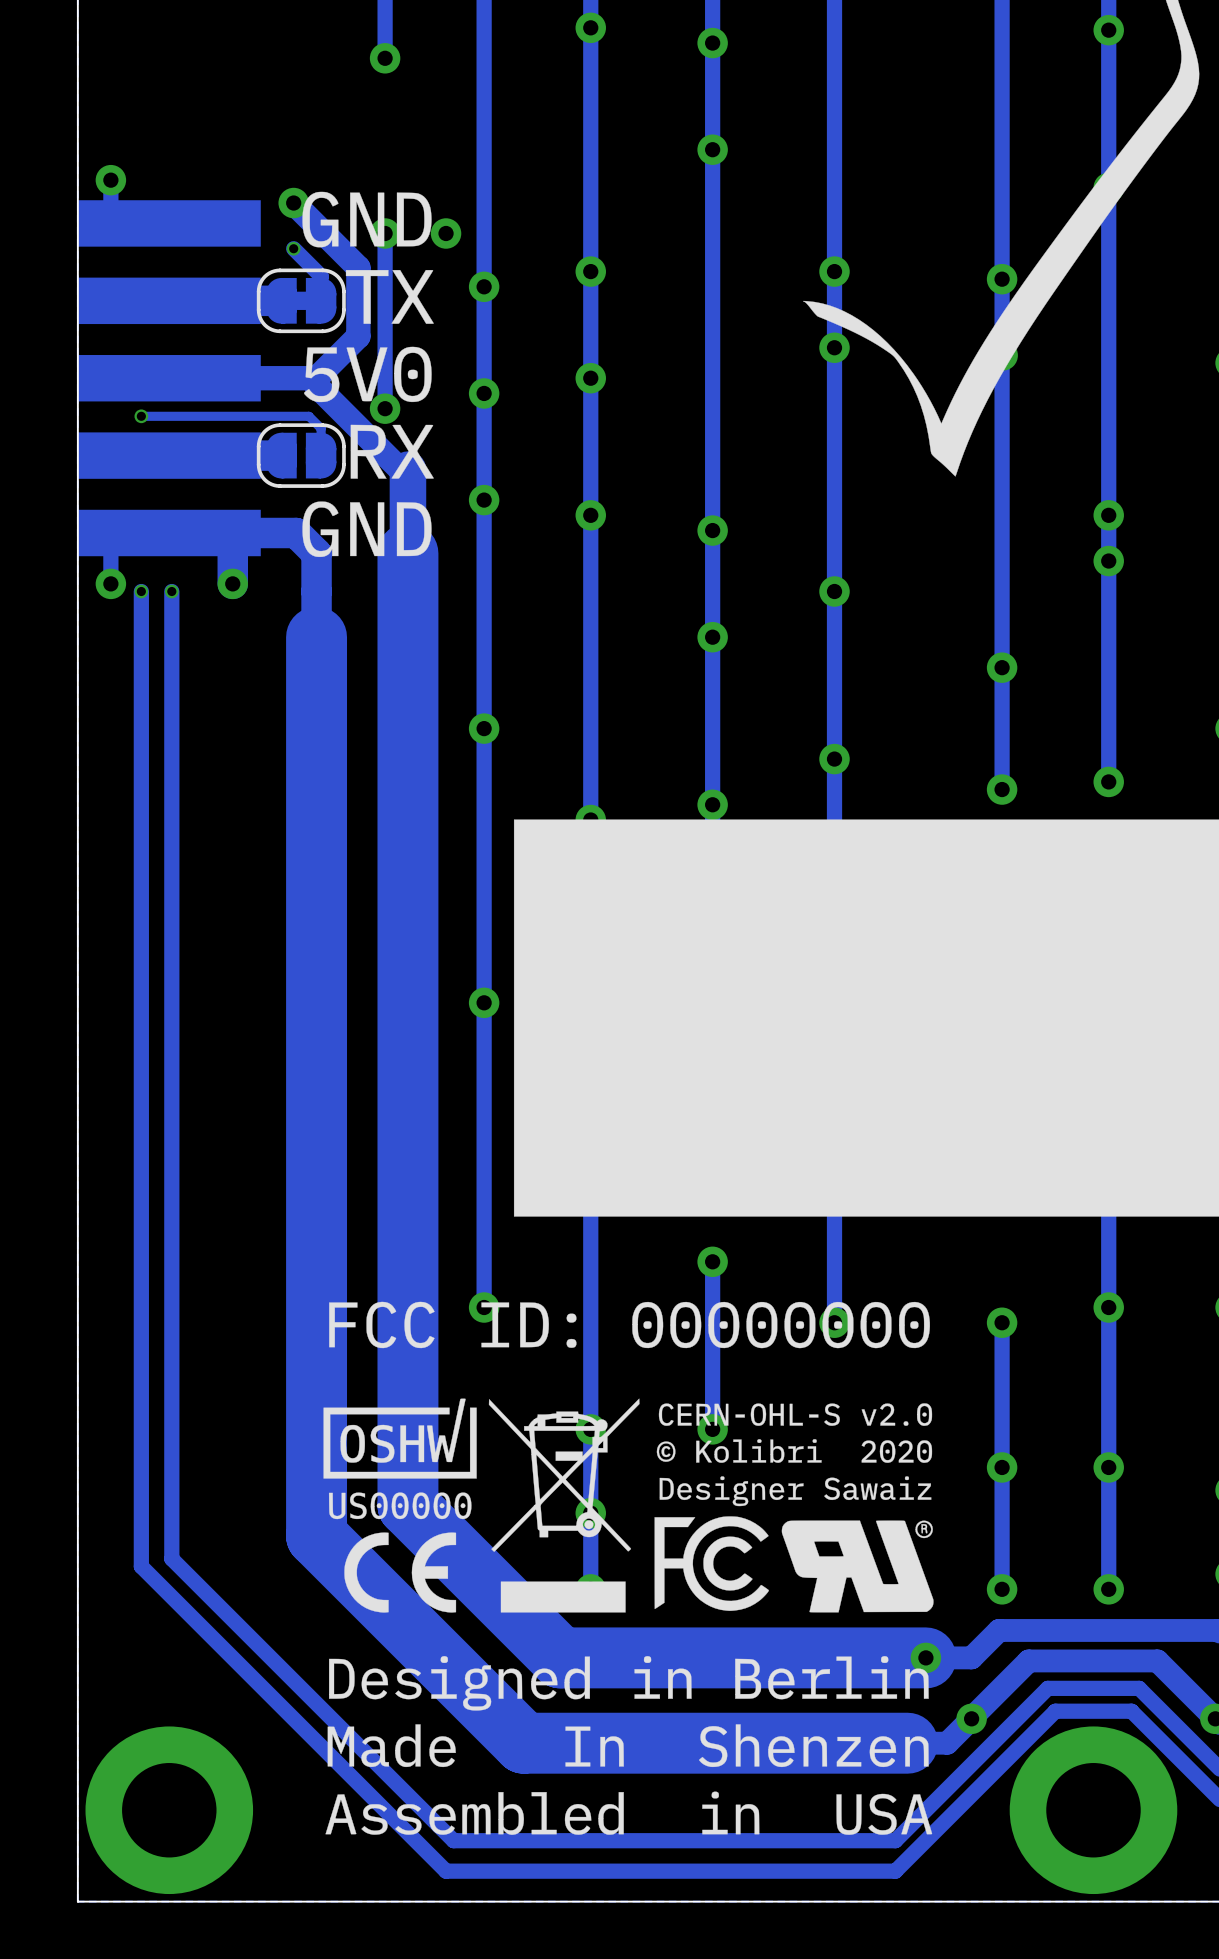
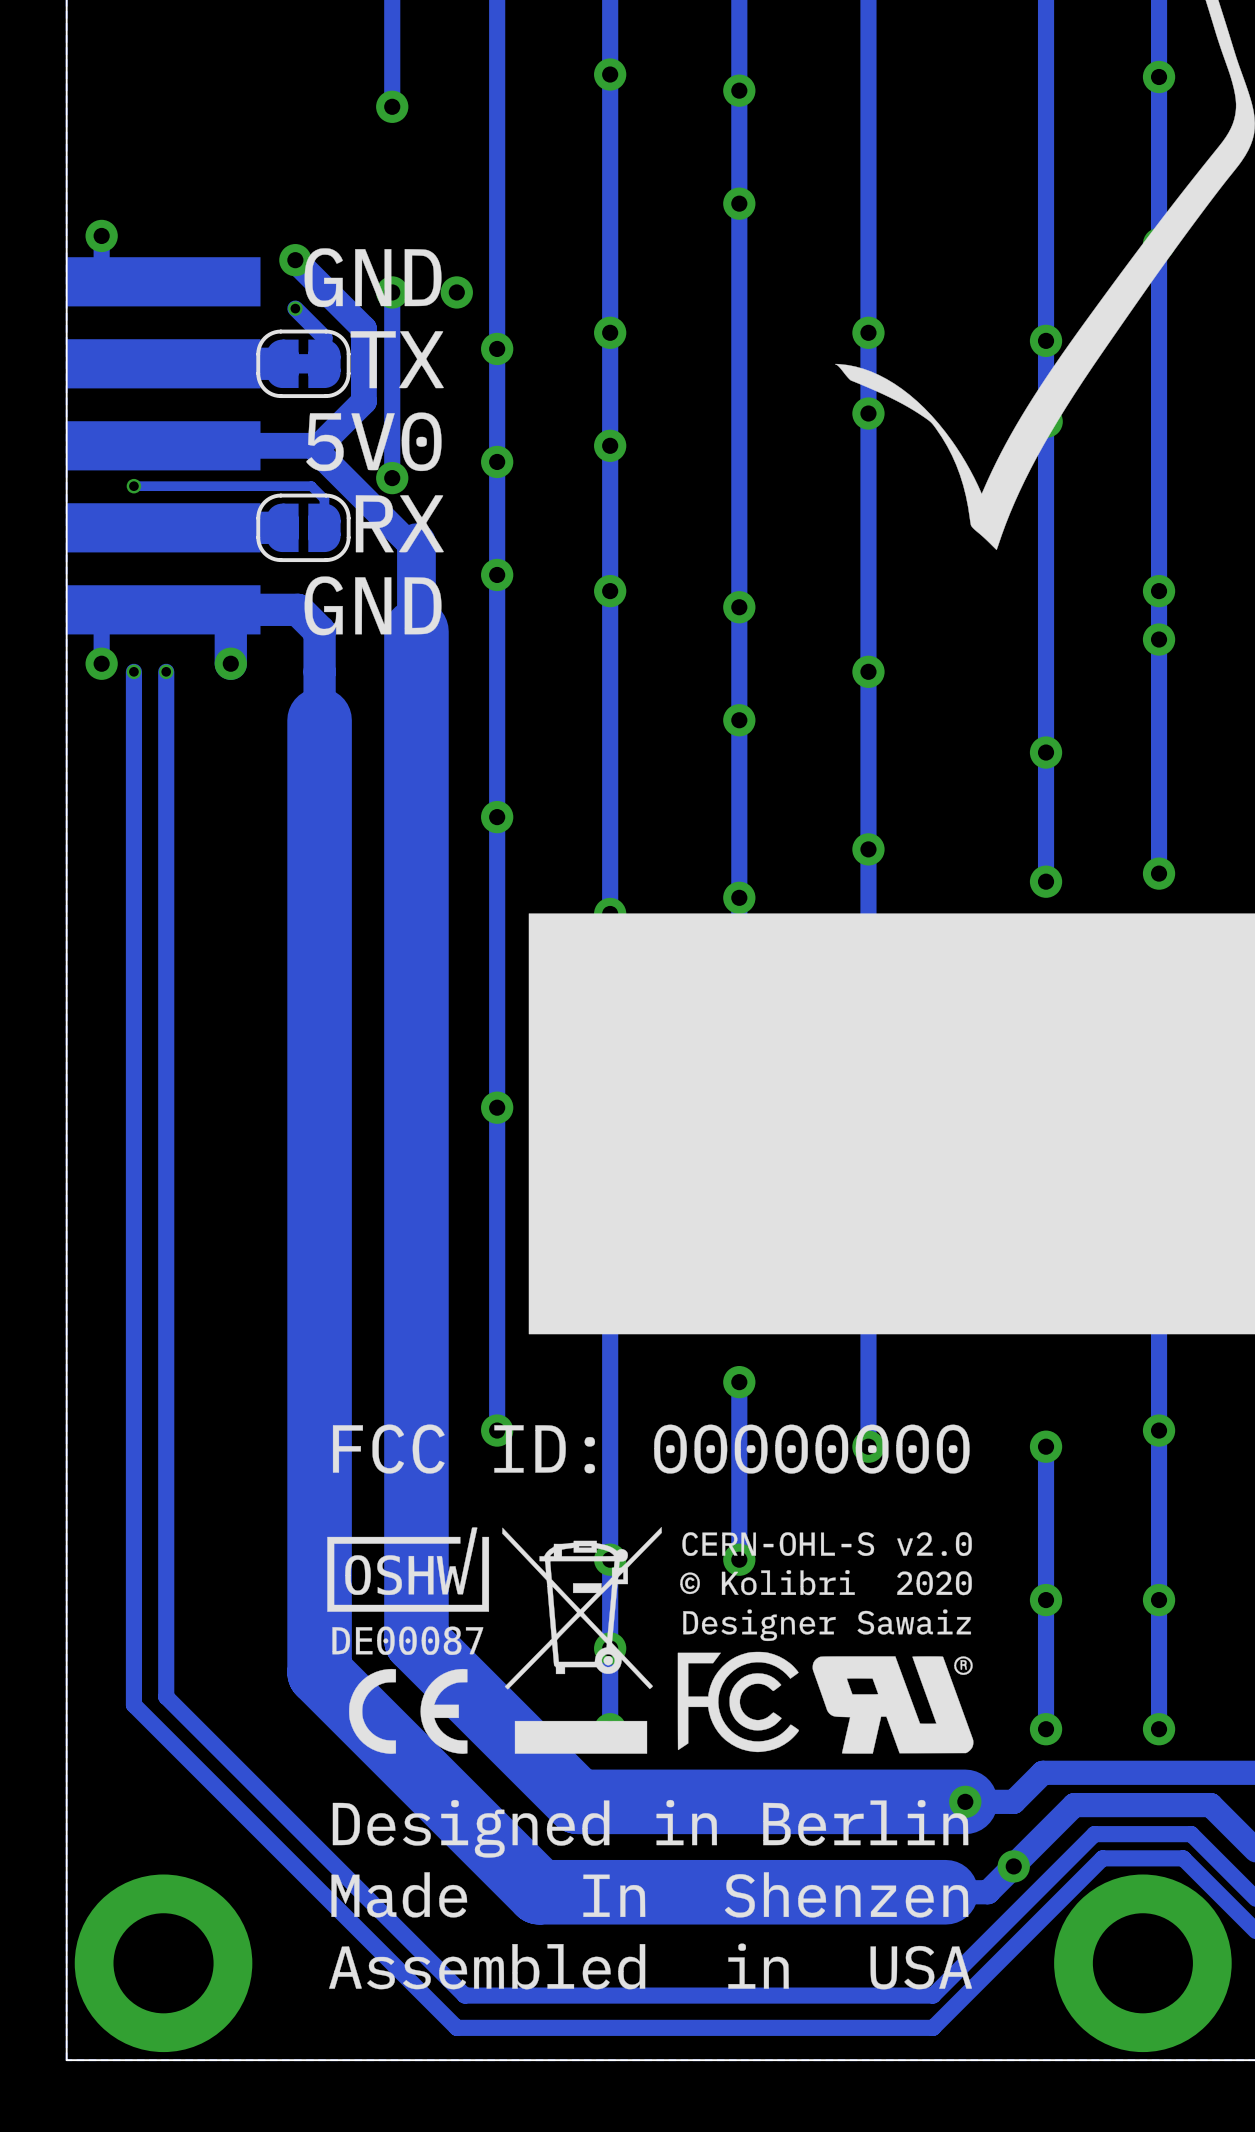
drawing shape: [323, 1398, 477, 1520] -> [327, 1527, 490, 1655]

